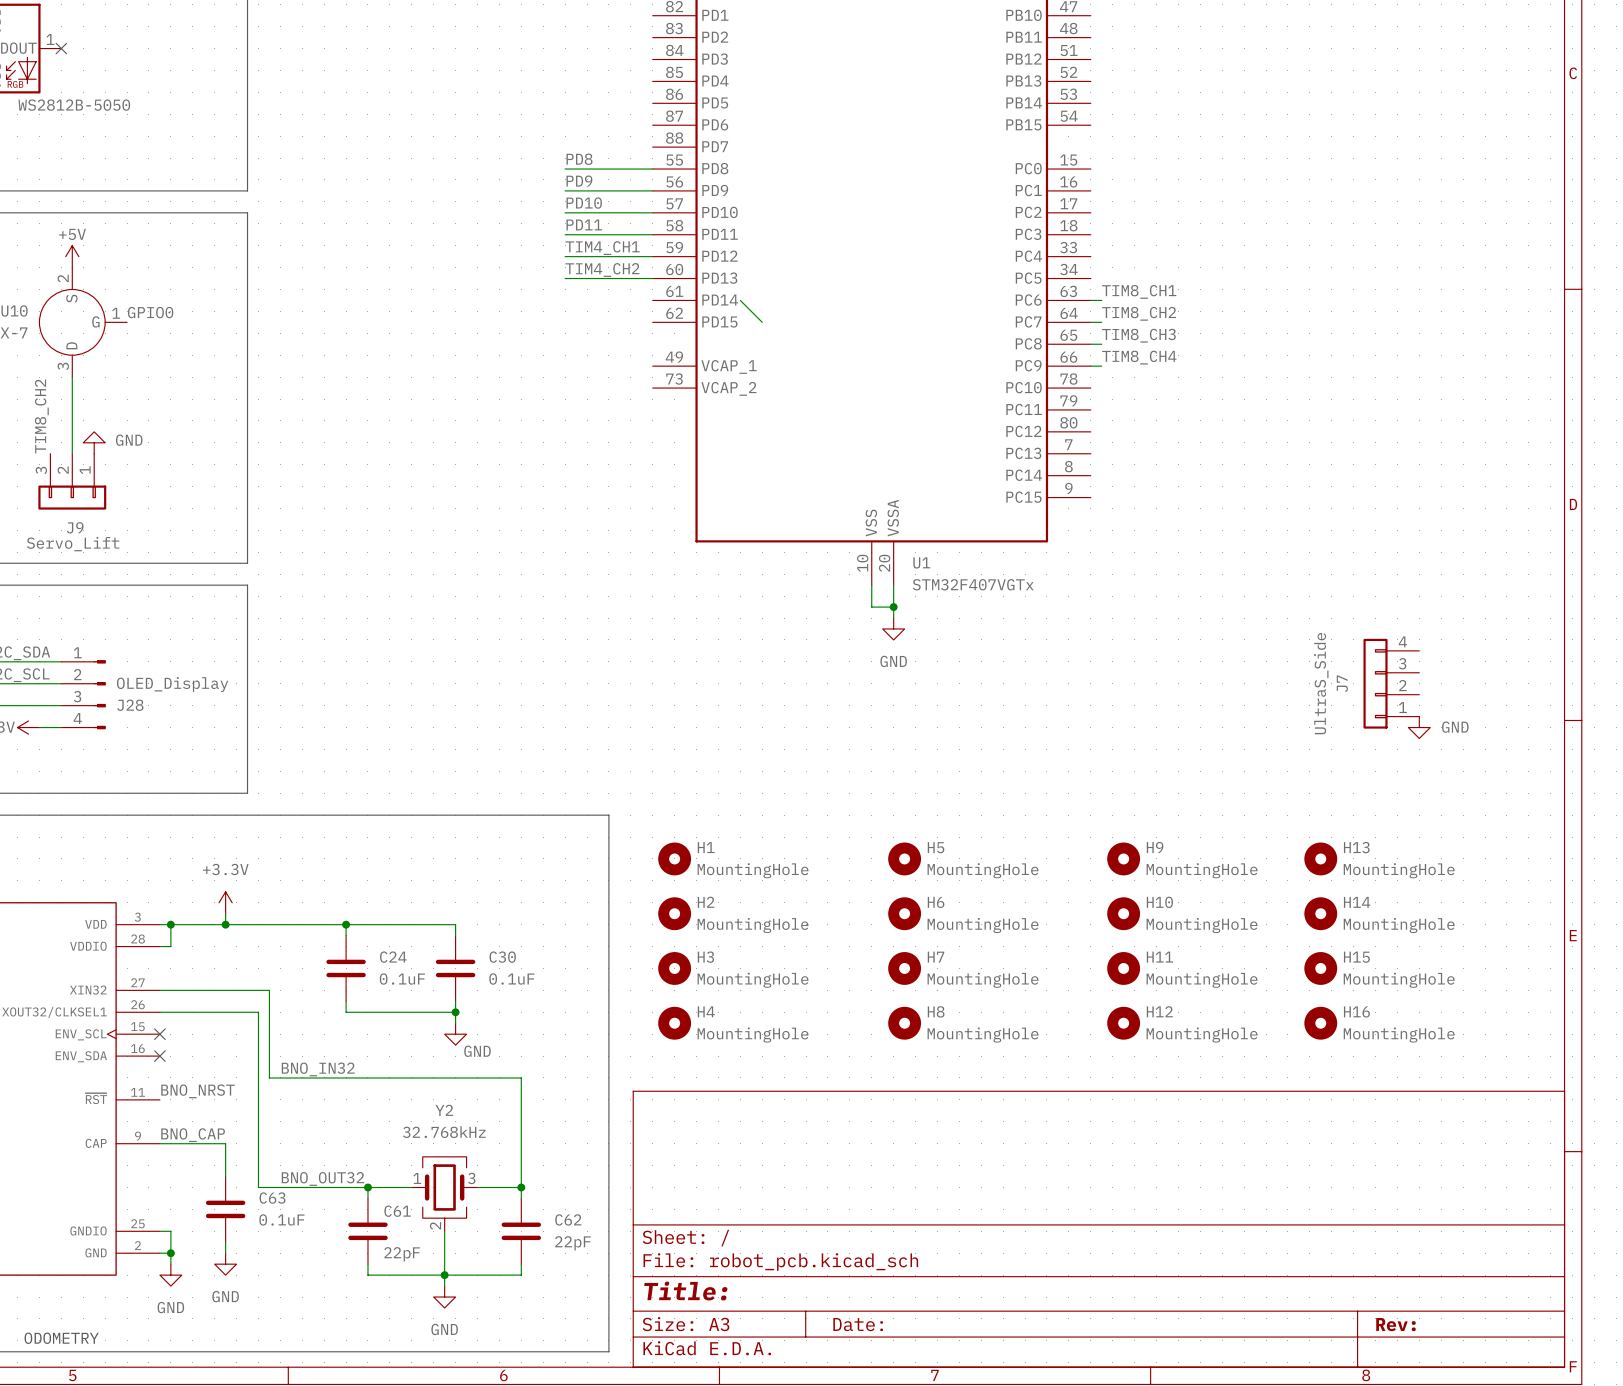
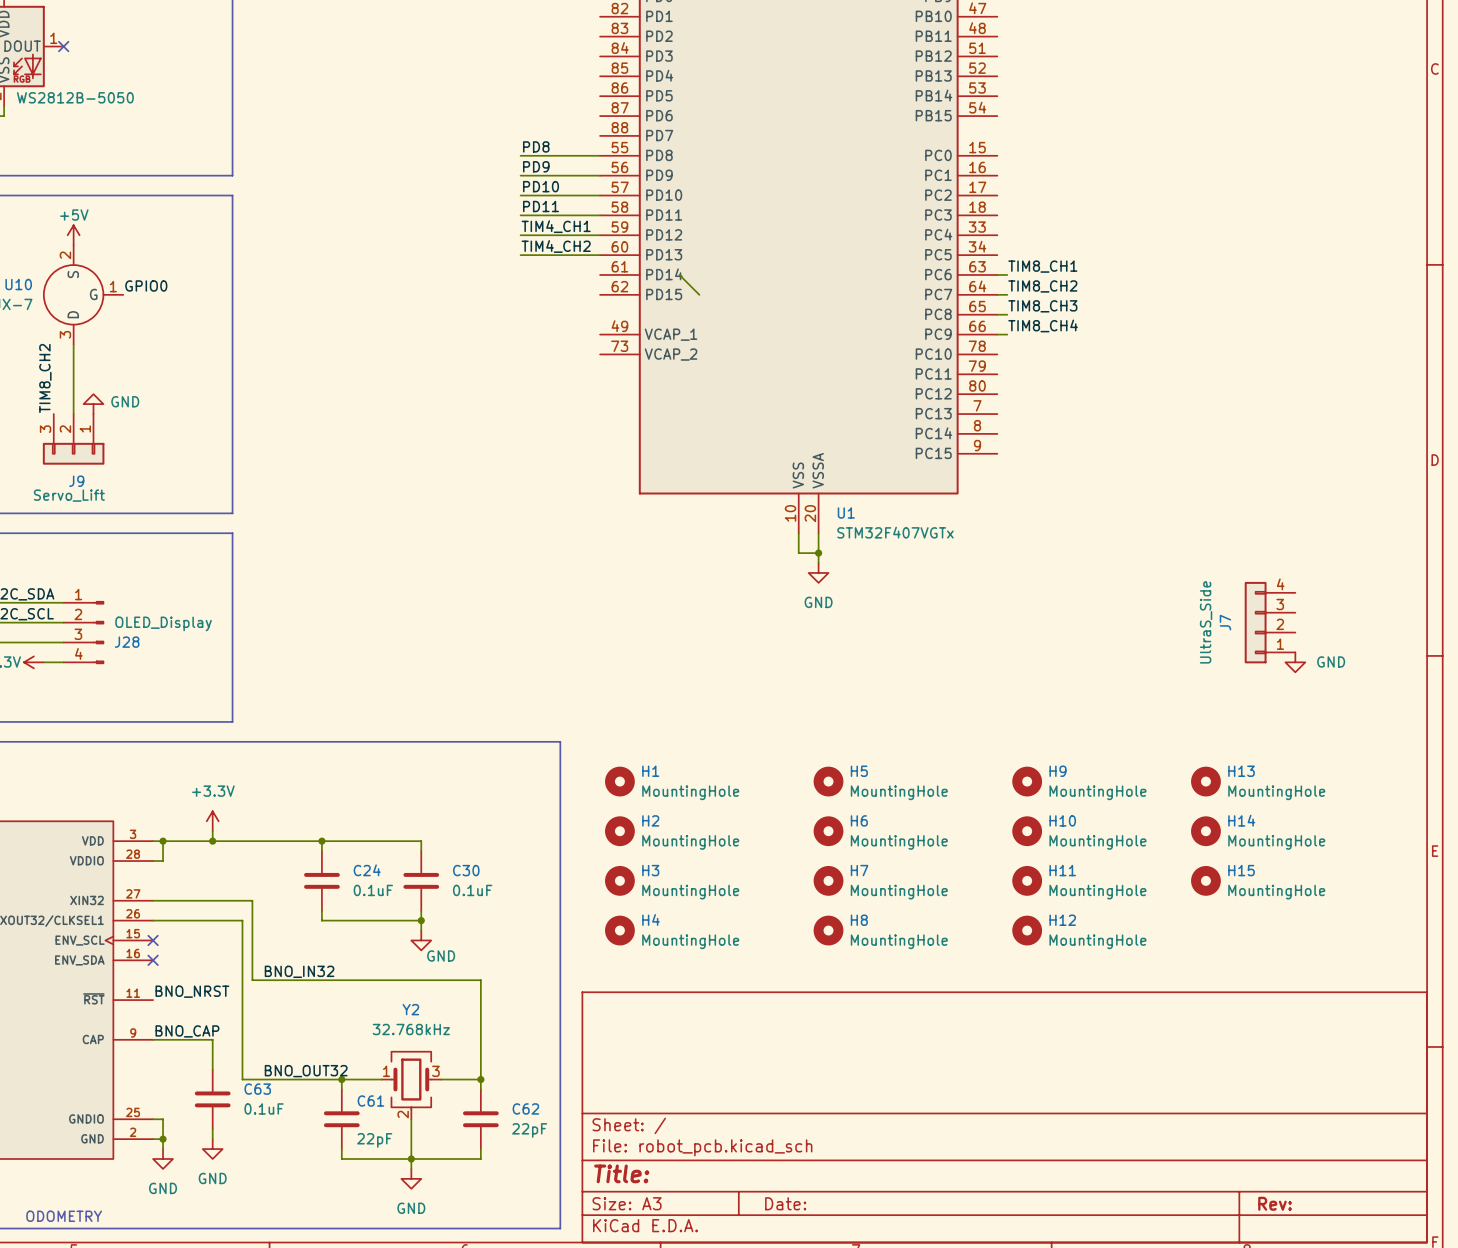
H16: MountingHole (1320, 1023) -> none

